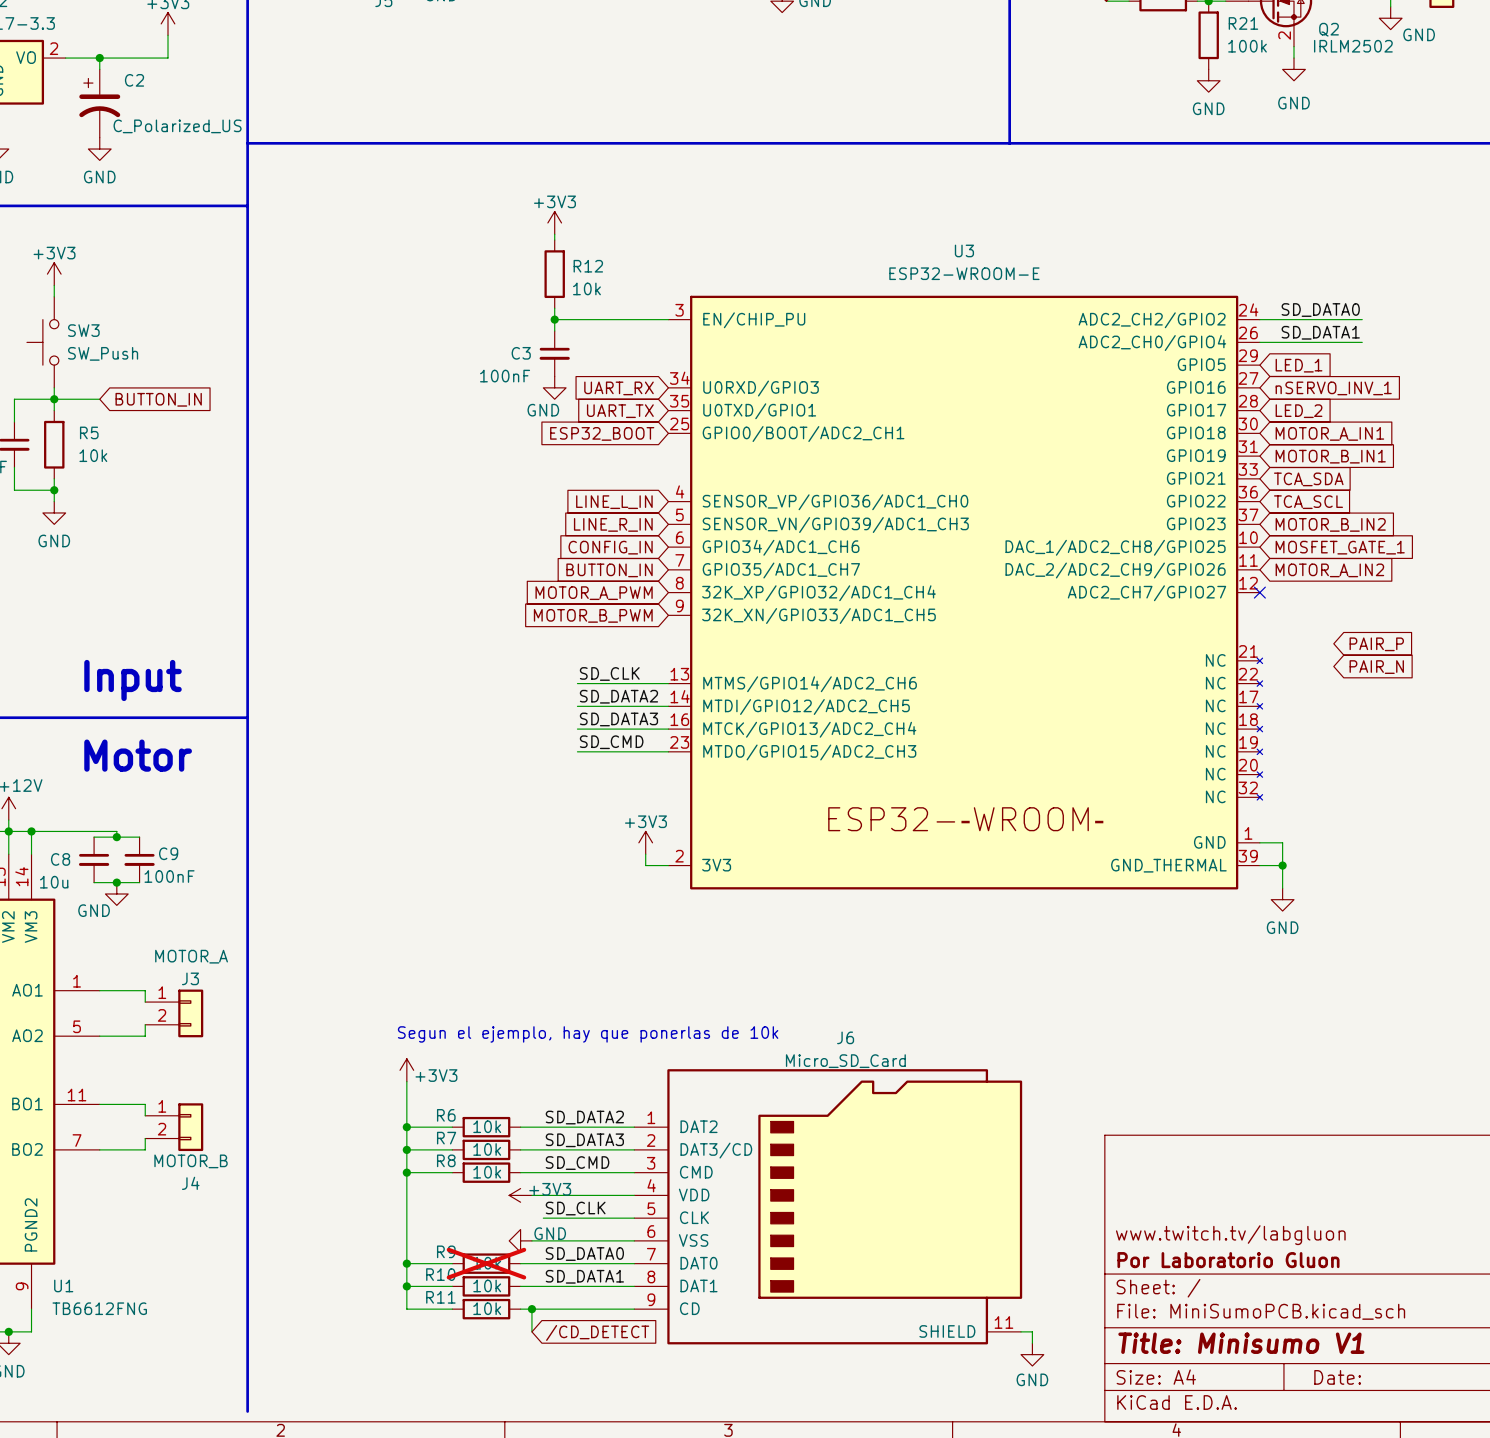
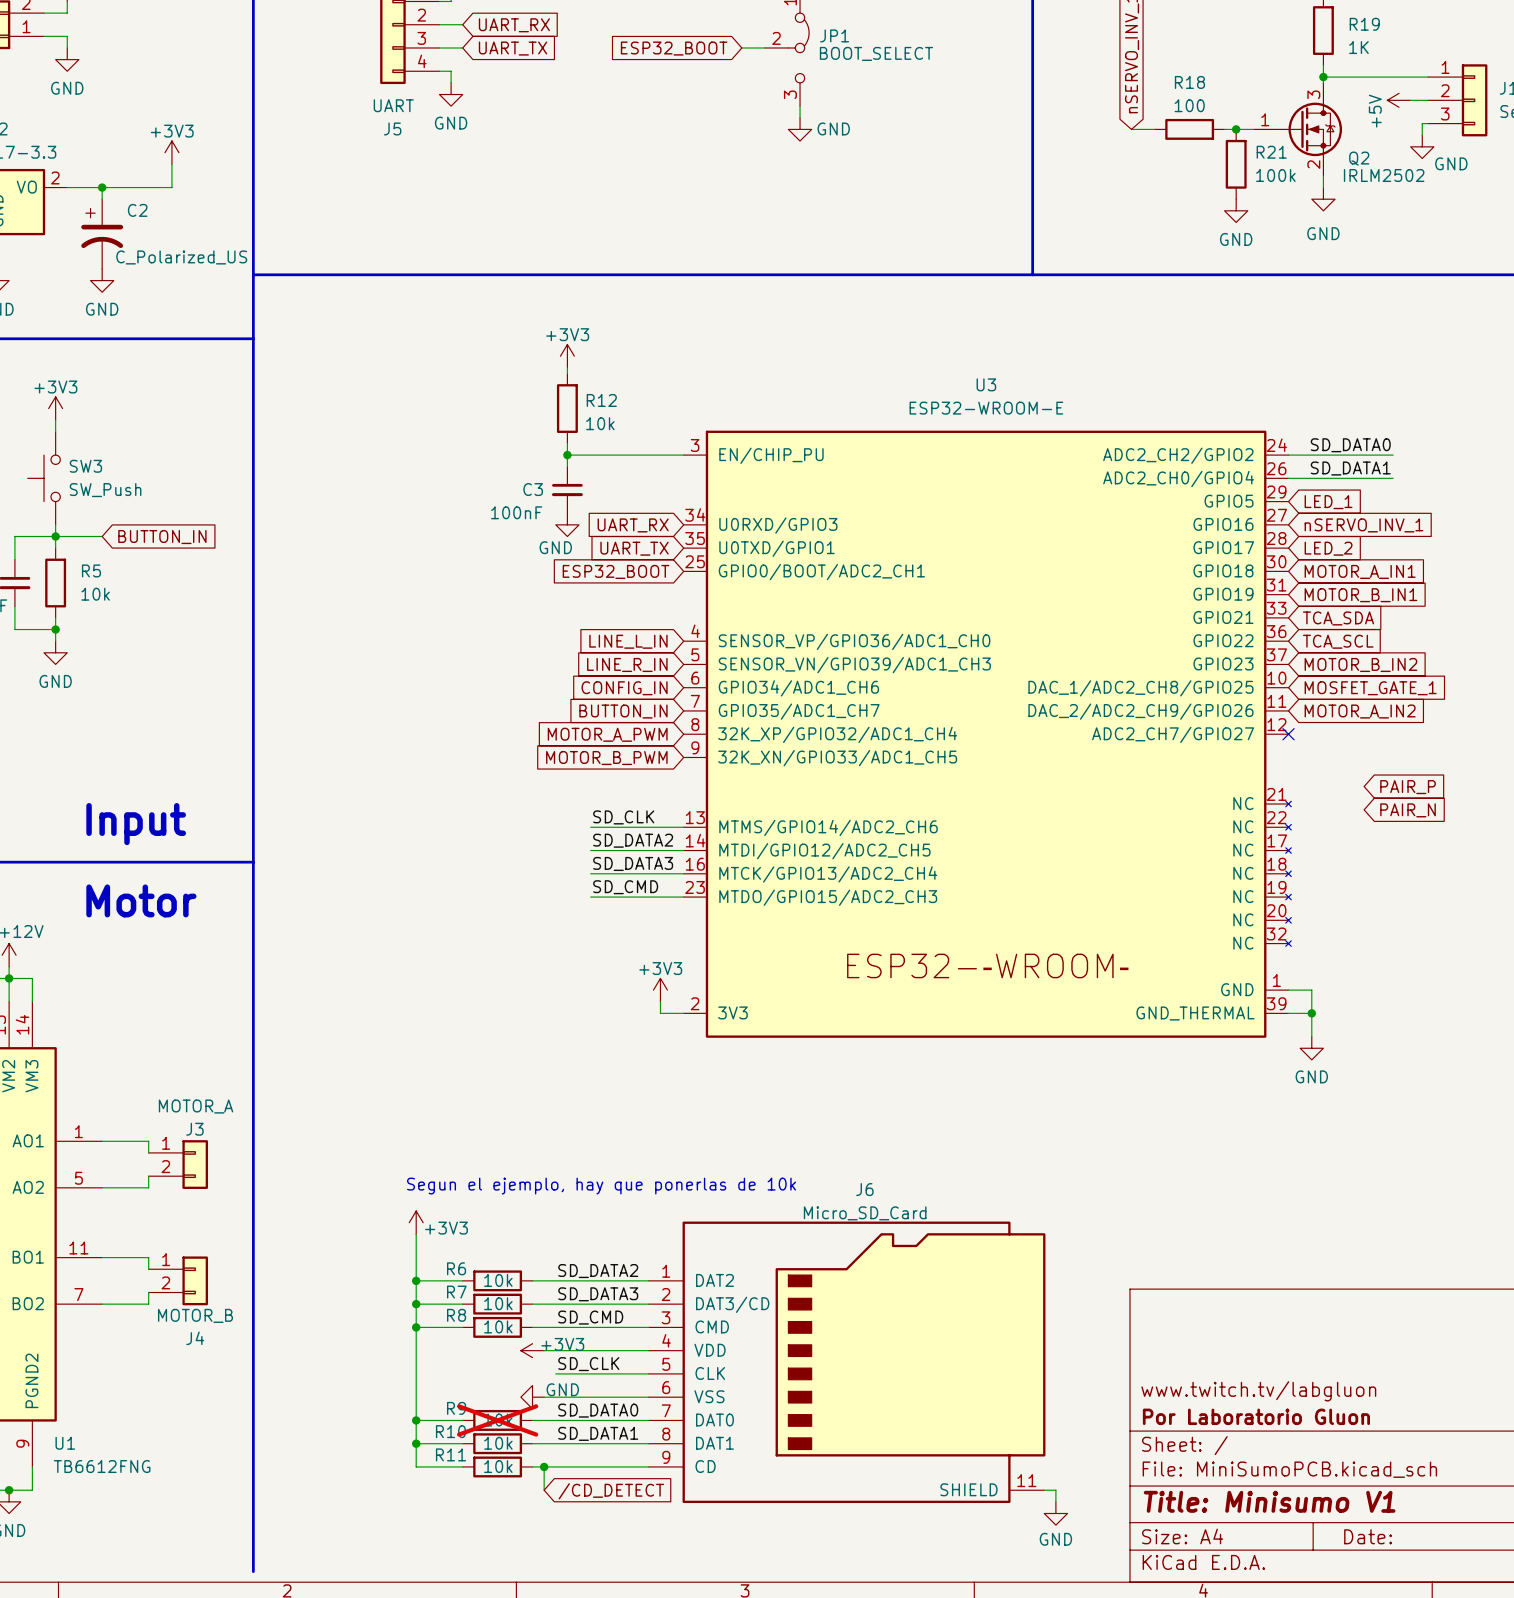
wire: (31, 831) (116, 831) (116, 837) -> none
junction: (31, 831) -> none
wire: (94, 837) (139, 837) -> none
junction: (116, 837) -> none
C8: 10u (94, 859) -> none
C9: 100nF (139, 859) -> none
wire: (94, 882) (139, 882) -> none
junction: (116, 882) -> none
power symbol: GND (116, 894) -> none

